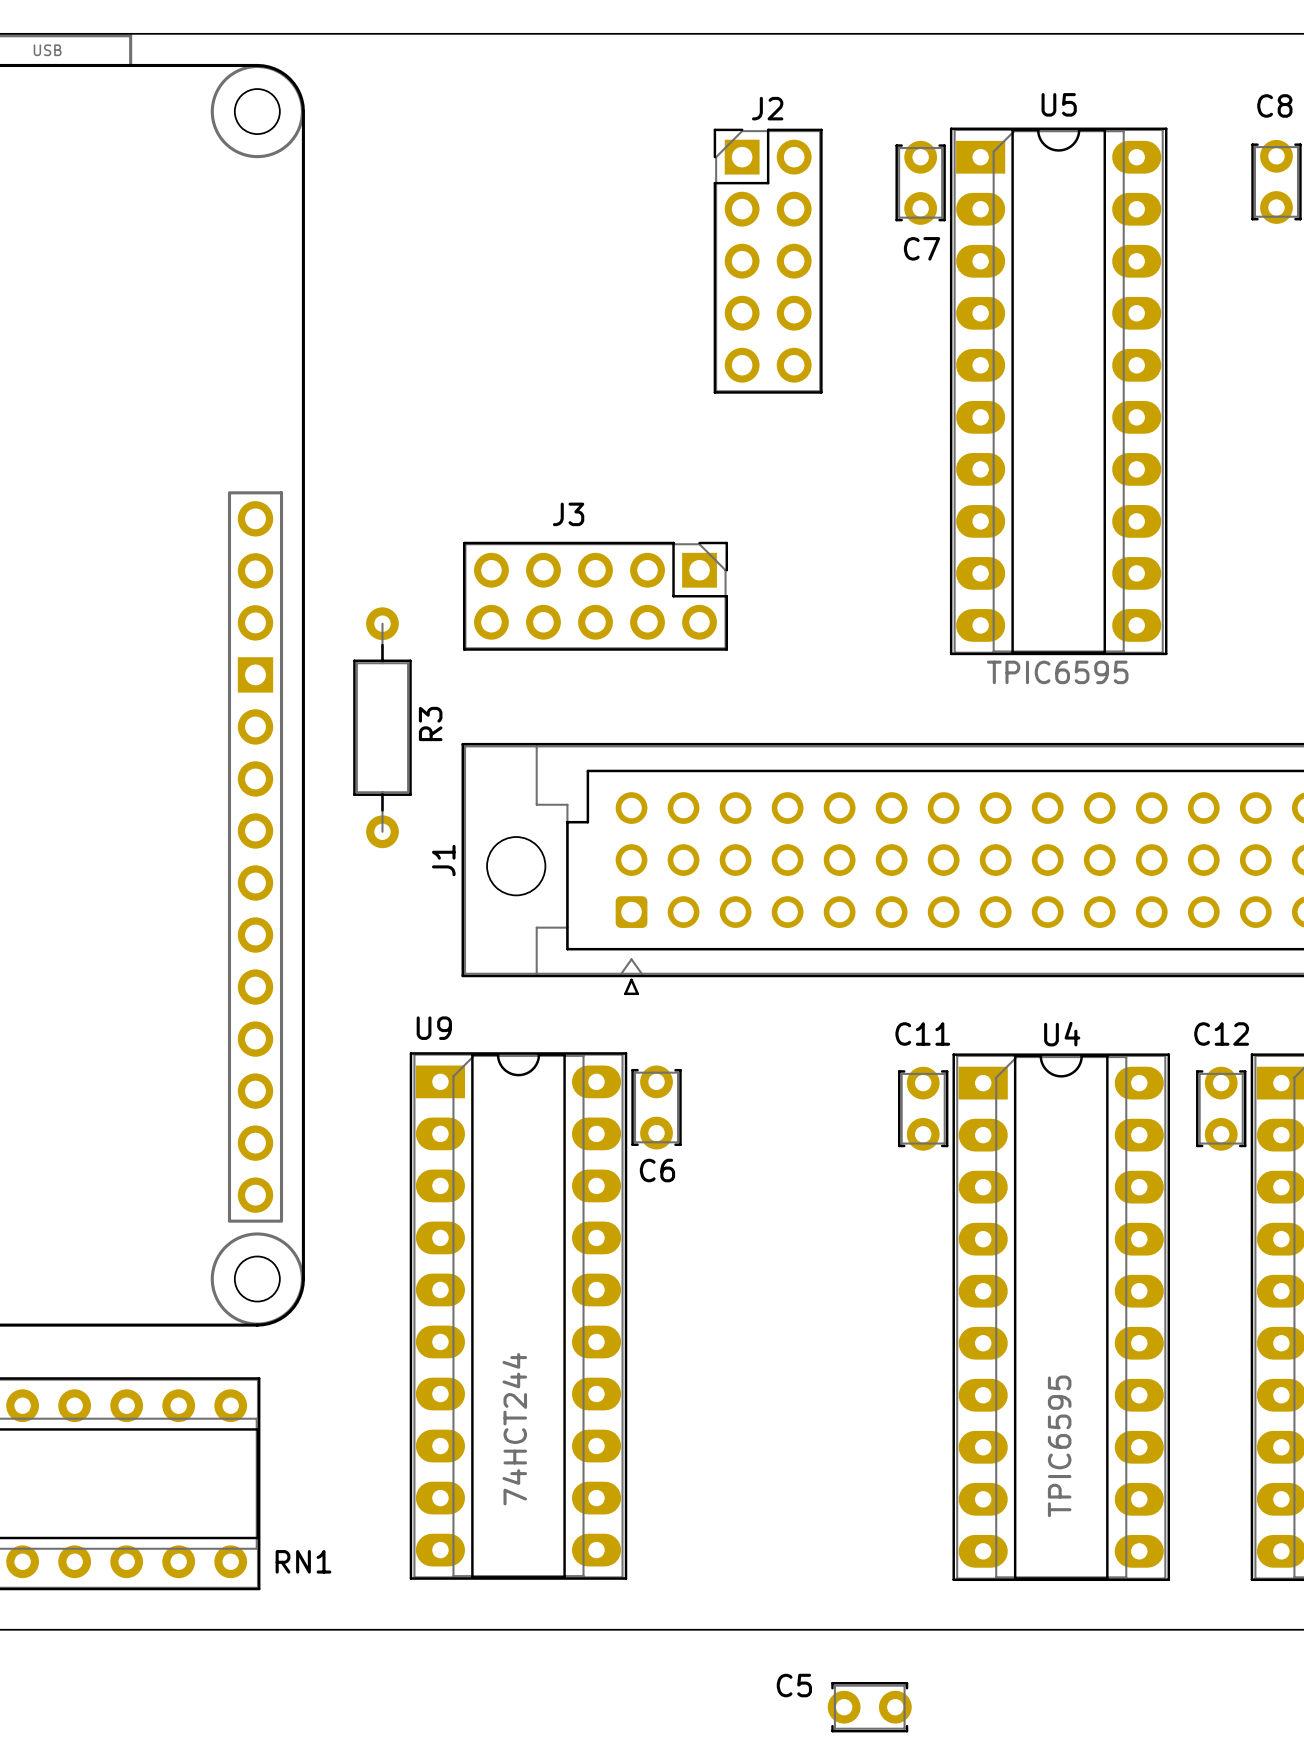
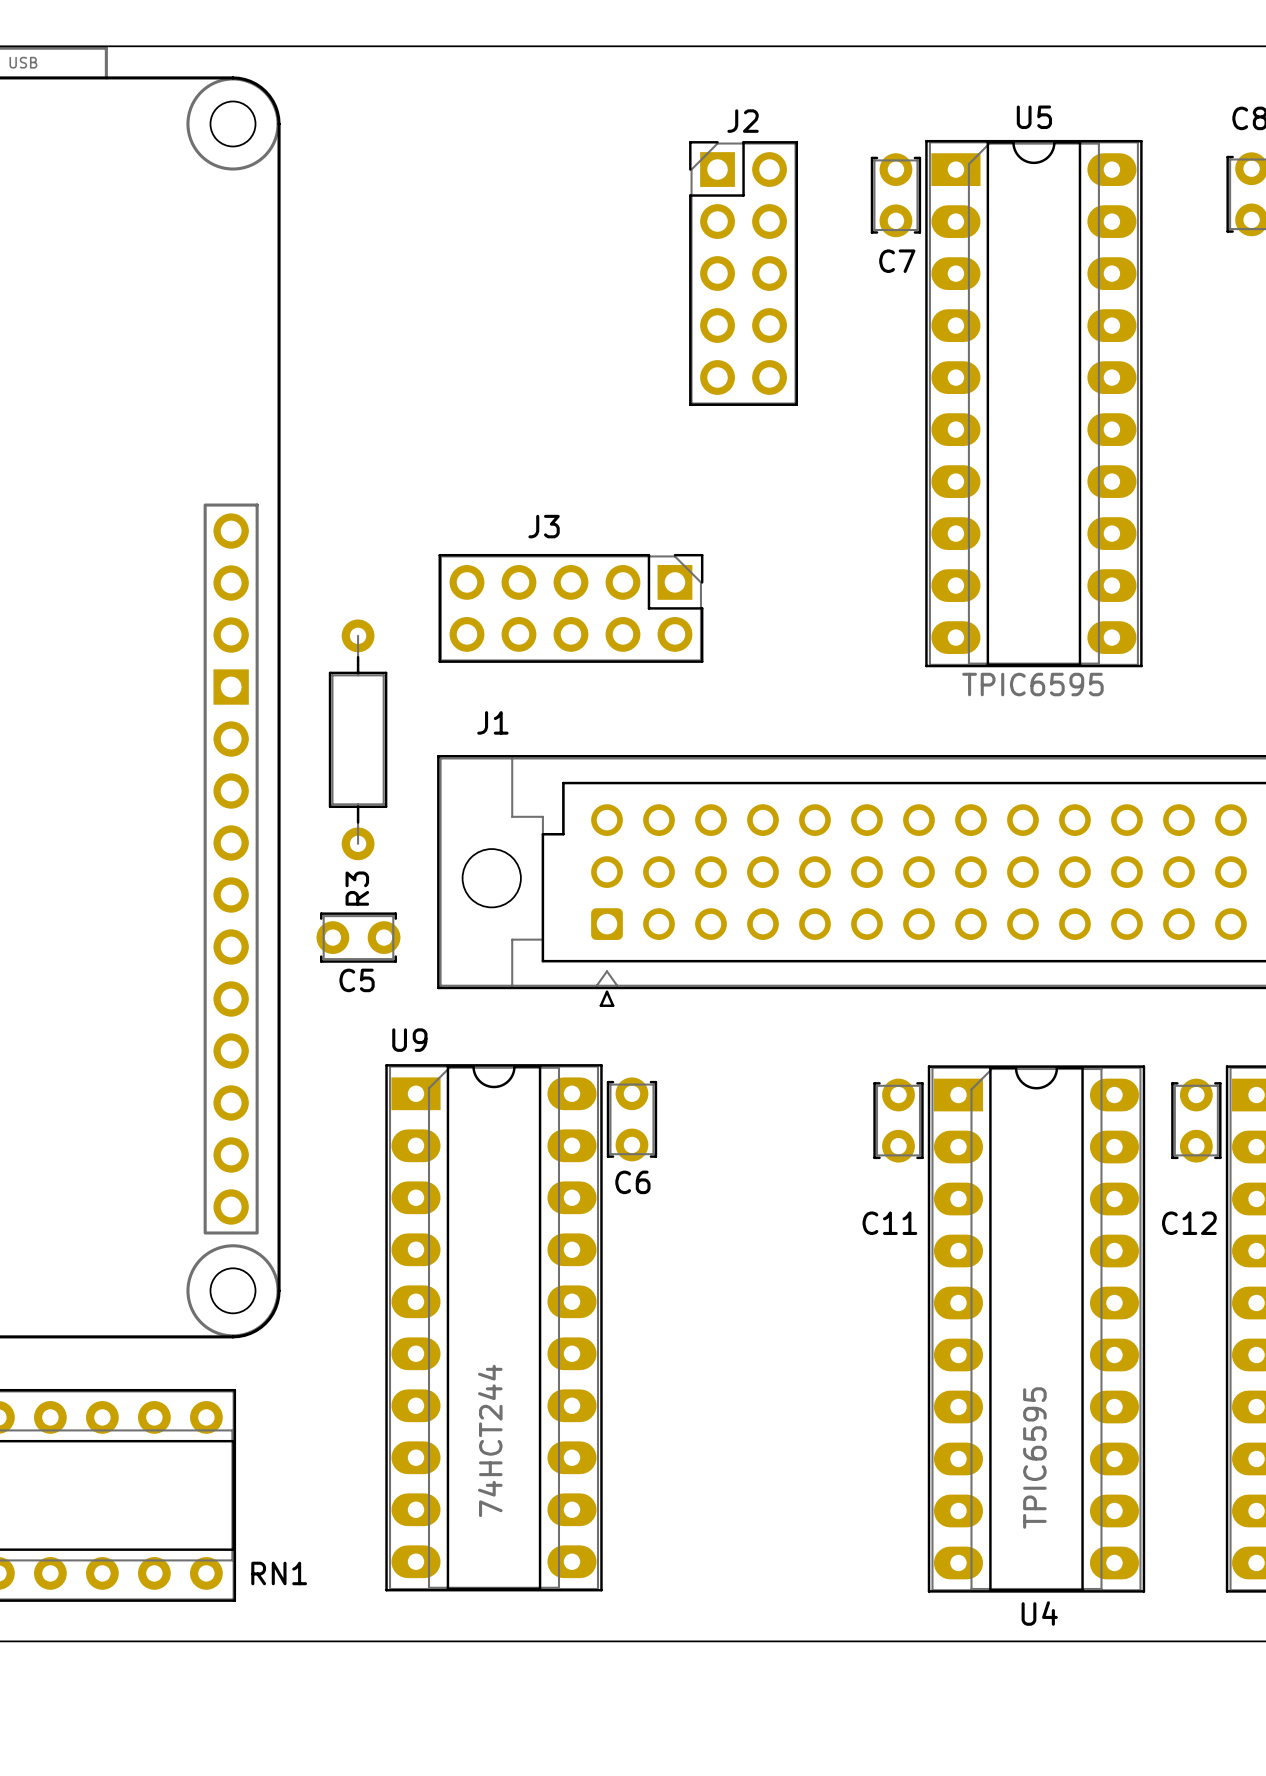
R3 name position: R3 (430, 723) -> R3 (357, 888)
J1 name rotation: 0° (443, 860) -> 90° clockwise (492, 722)
J1 name position: J1 (443, 860) -> J1 (492, 722)
C11 name position: C11 (922, 1034) -> C11 (889, 1223)
U4 name position: U4 (1062, 1034) -> U4 (1039, 1613)
C12 name position: C12 (1221, 1034) -> C12 (1189, 1223)
C5 name position: C5 (794, 1685) -> C5 (357, 980)
C5 position: (869, 1707) -> (358, 937)

